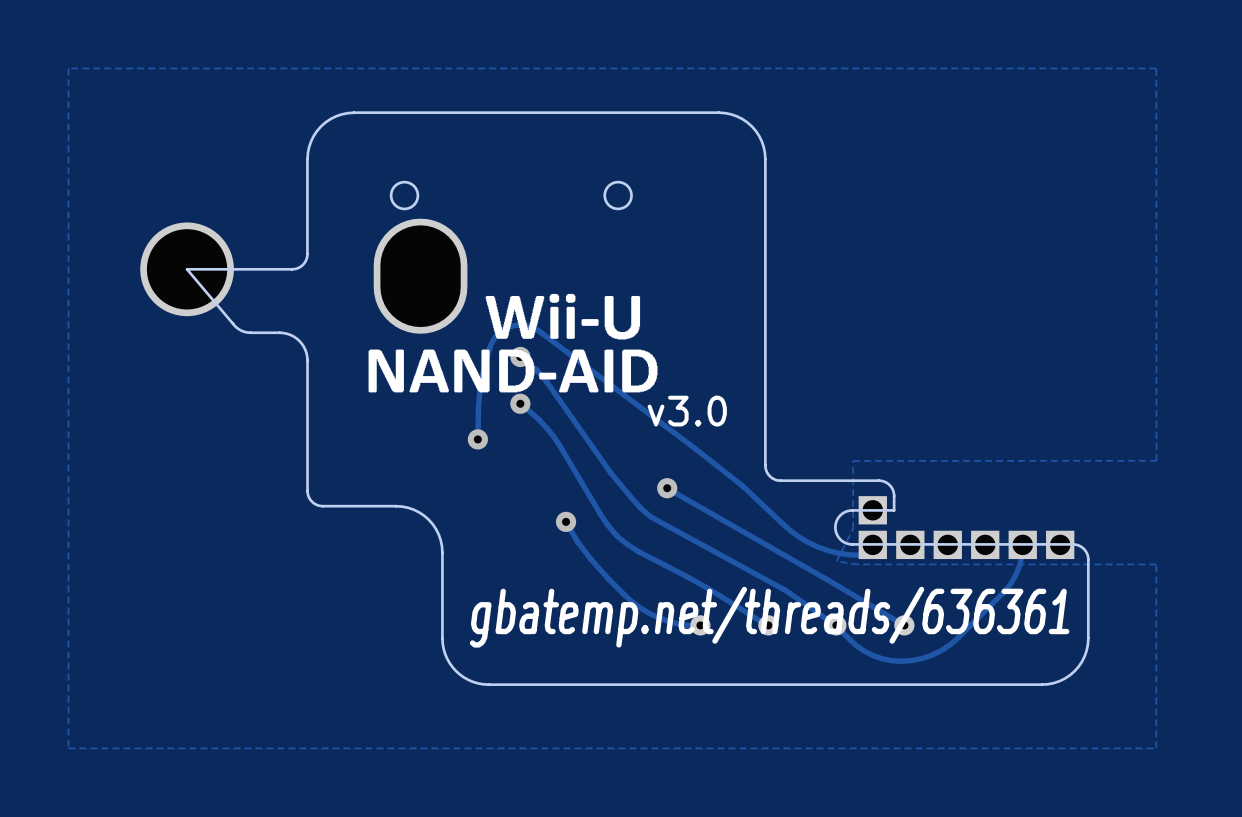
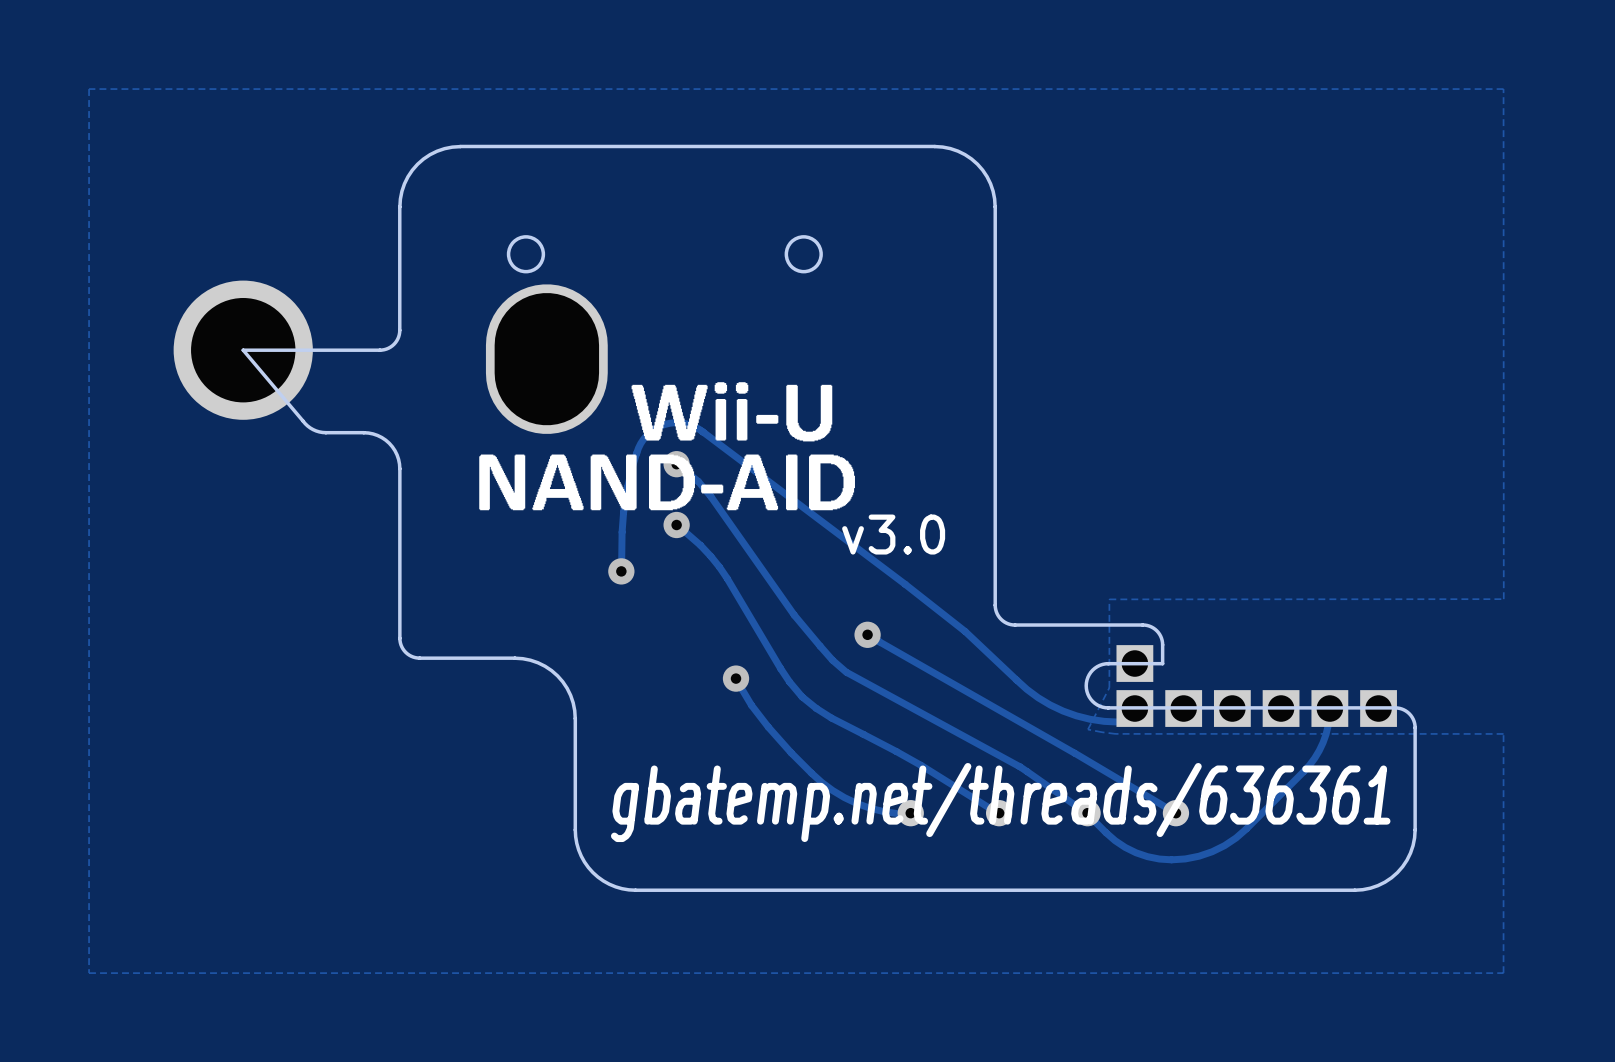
part footprint: [140, 222, 234, 317] -> [173, 280, 313, 420]

